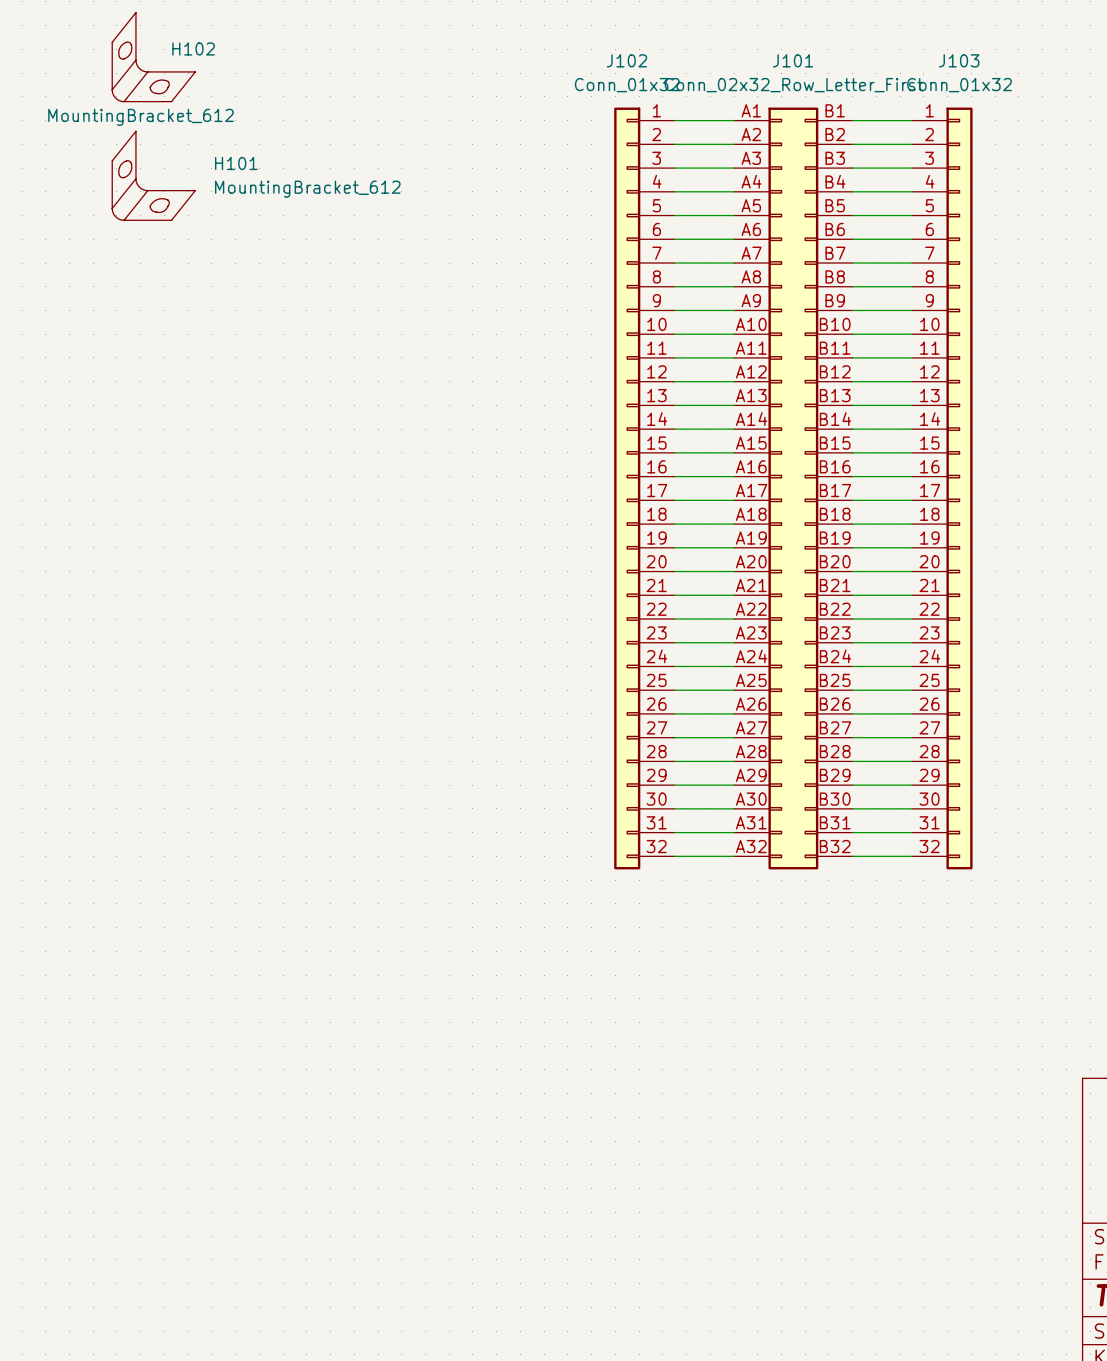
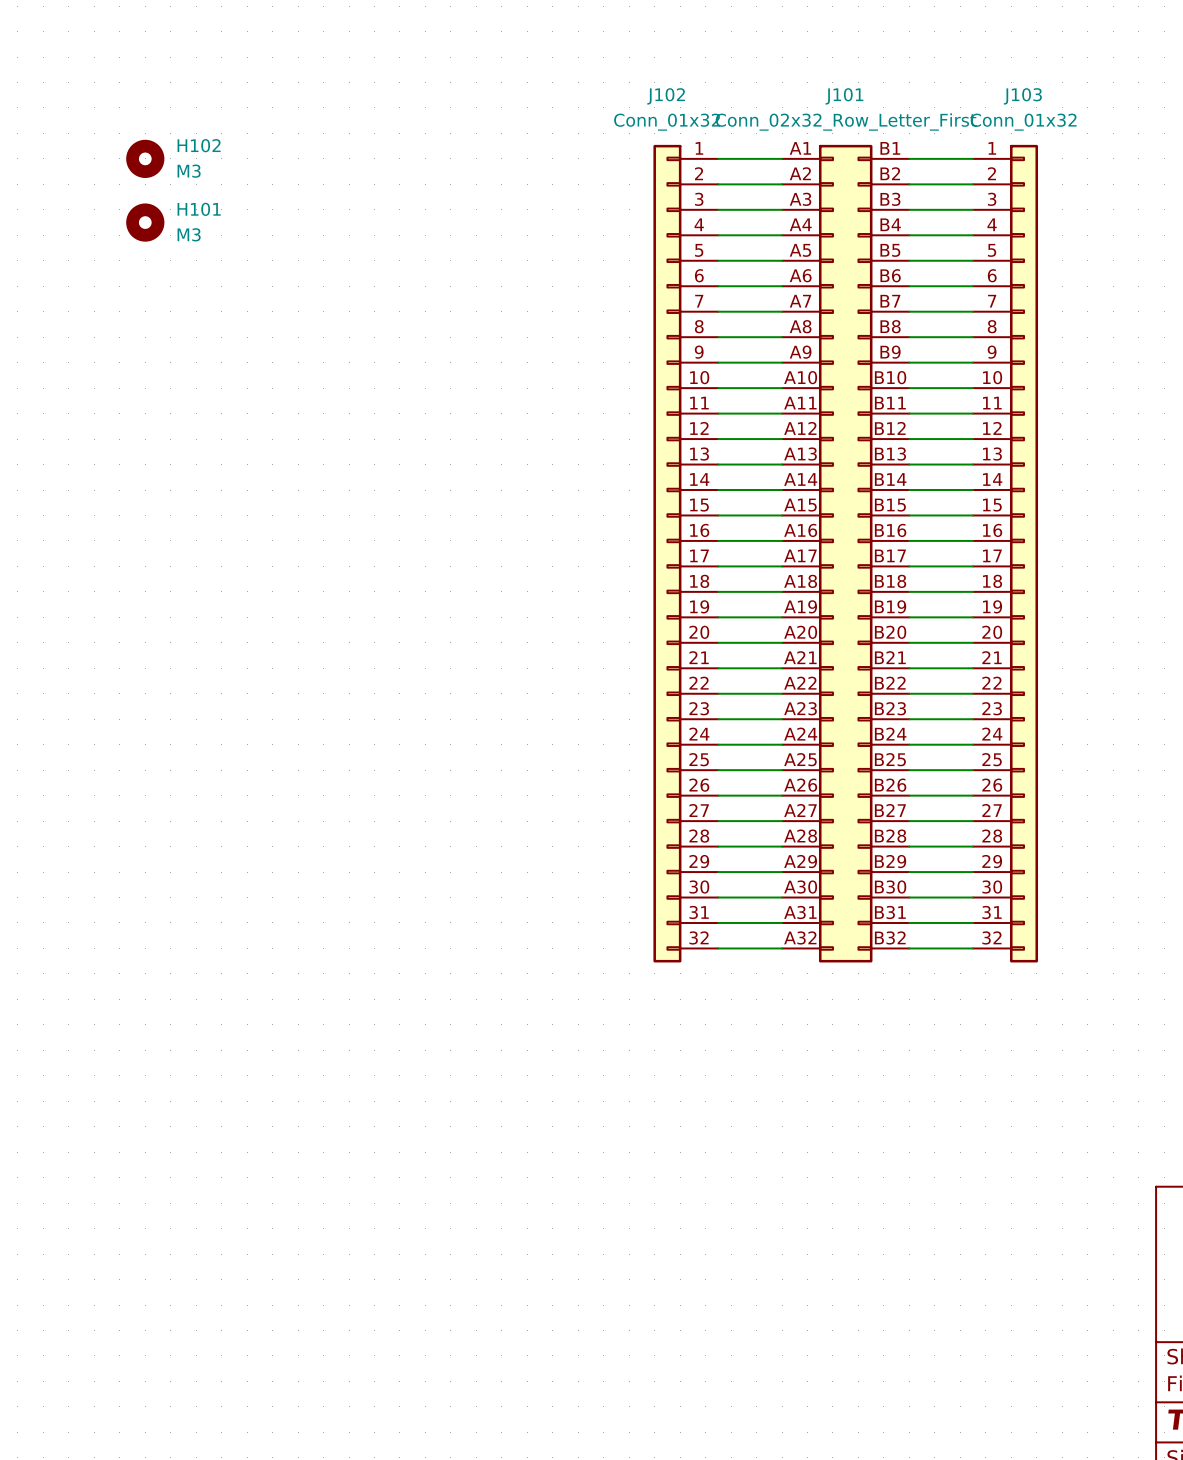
H102 symbol: [112, 12, 196, 102] -> [126, 139, 165, 178]
H102 value: MountingBracket_612 (140, 117) -> M3 (189, 171)
H101 symbol: [112, 131, 196, 221] -> [126, 203, 165, 242]
H101 name position: H101 (236, 163) -> H101 (199, 209)
H101 value: MountingBracket_612 (307, 189) -> M3 (189, 234)

